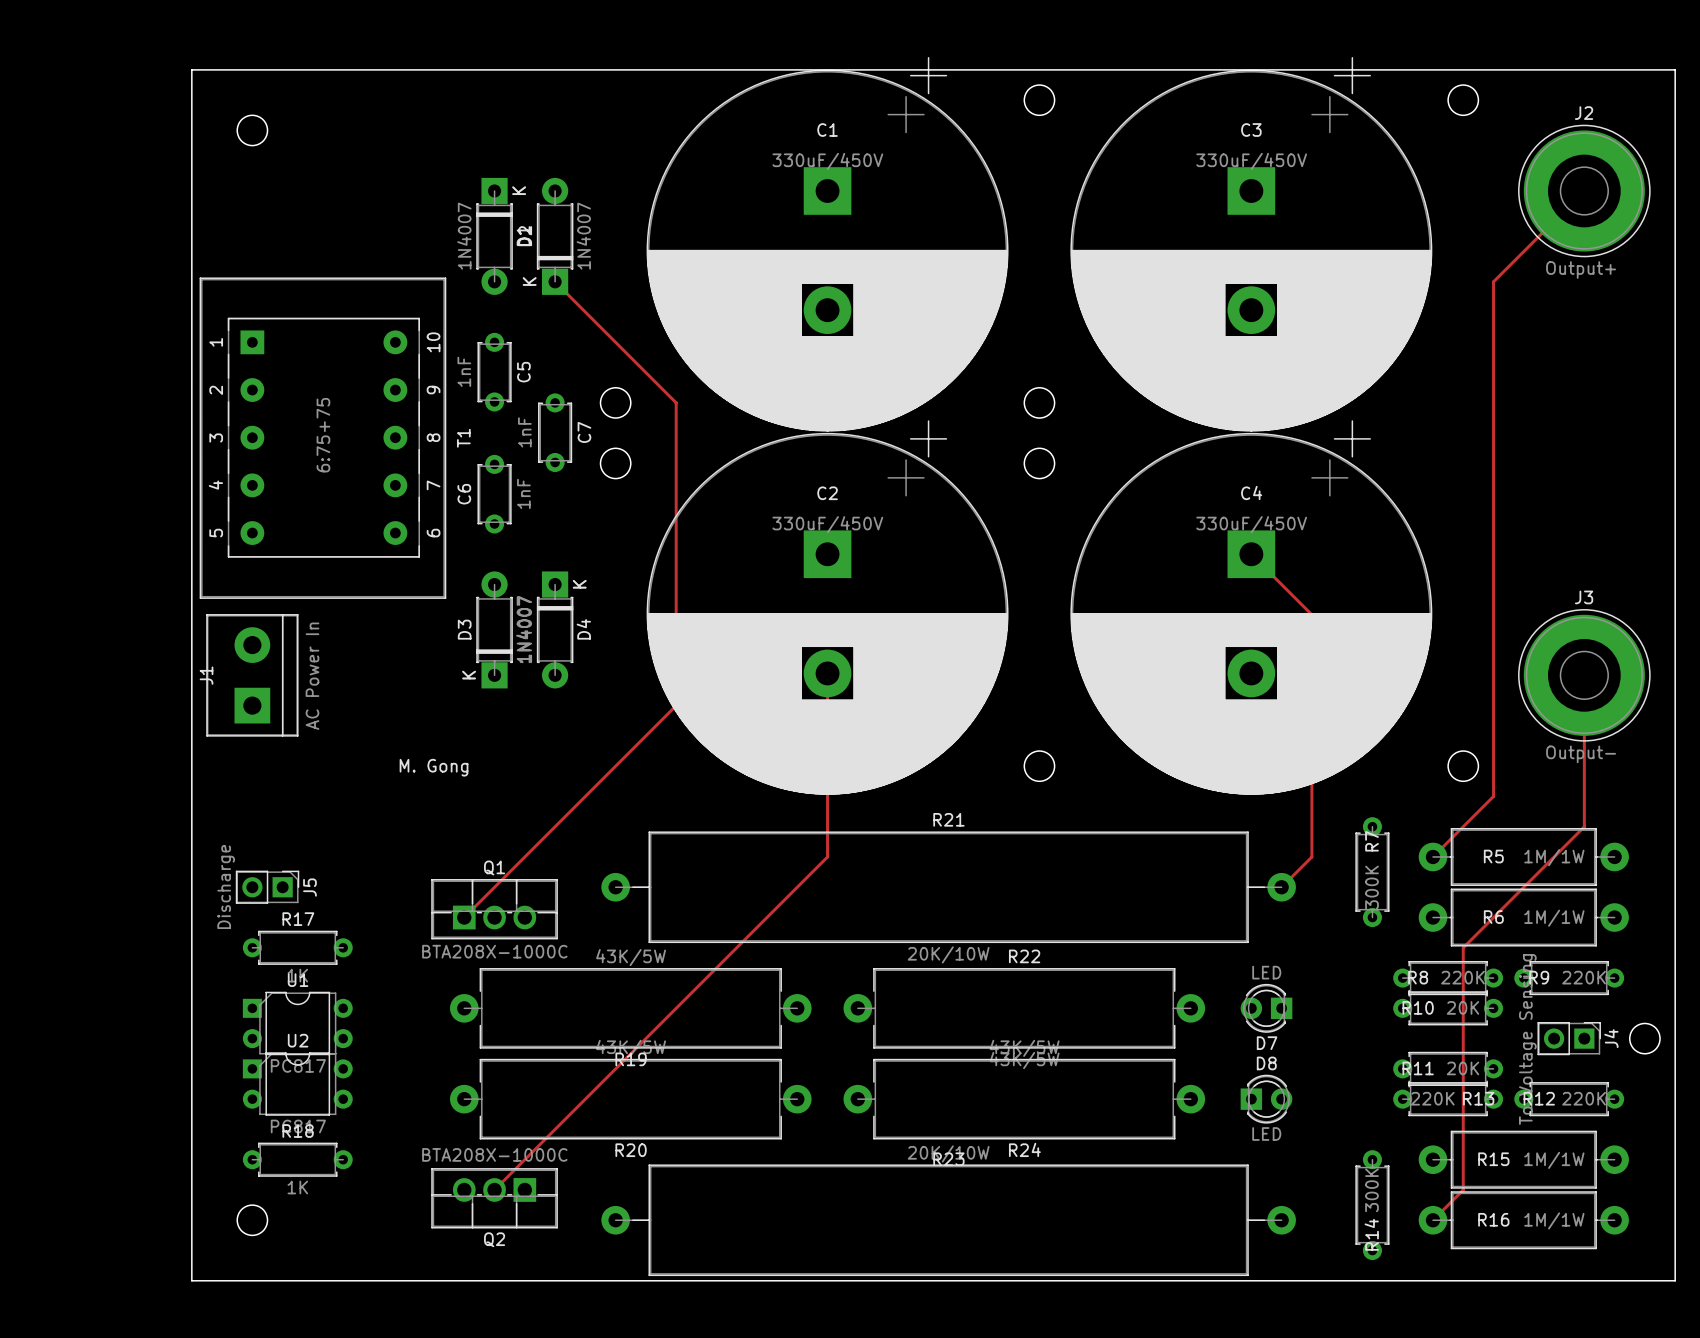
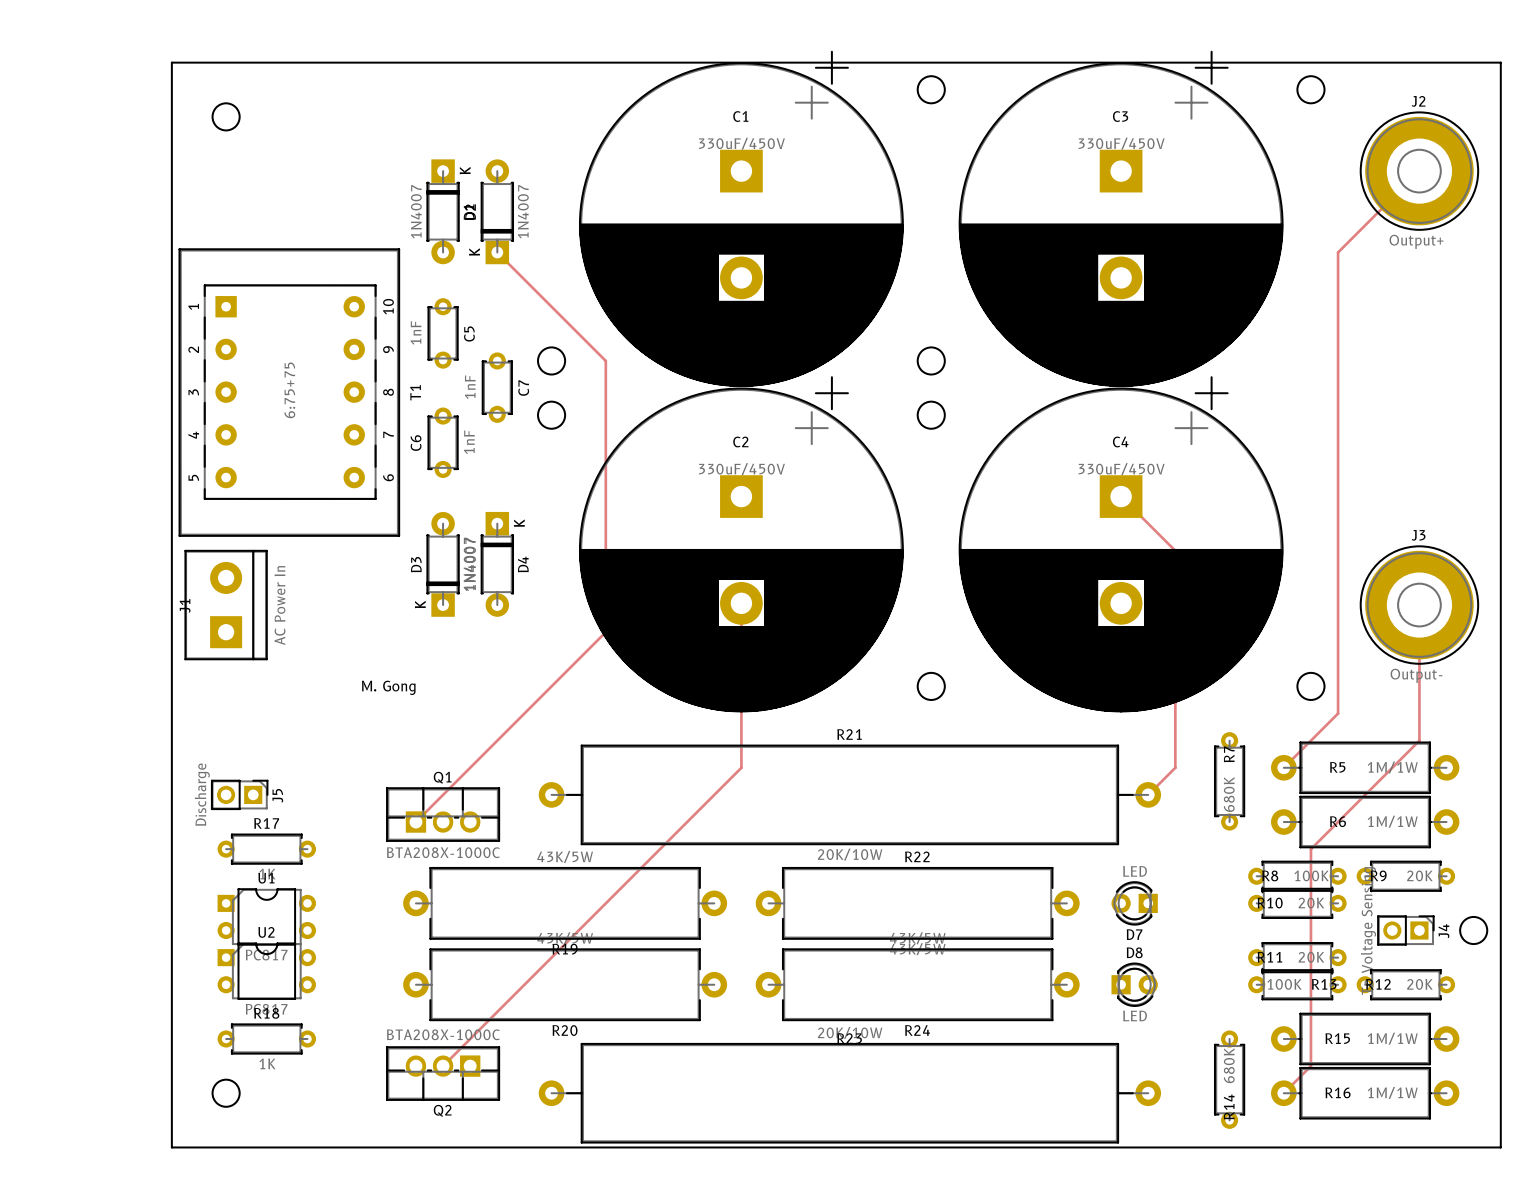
R7 value: 300K (1372, 887) -> 680K (1229, 794)
R8 value: 220K (1462, 977) -> 100K (1311, 875)
R9 value: 220K (1584, 977) -> 20K (1419, 875)
R13 value: 220K (1432, 1098) -> 100K (1284, 984)
R12 value: 220K (1584, 1098) -> 20K (1419, 984)
R14 value: 300K (1372, 1190) -> 680K (1229, 1065)

